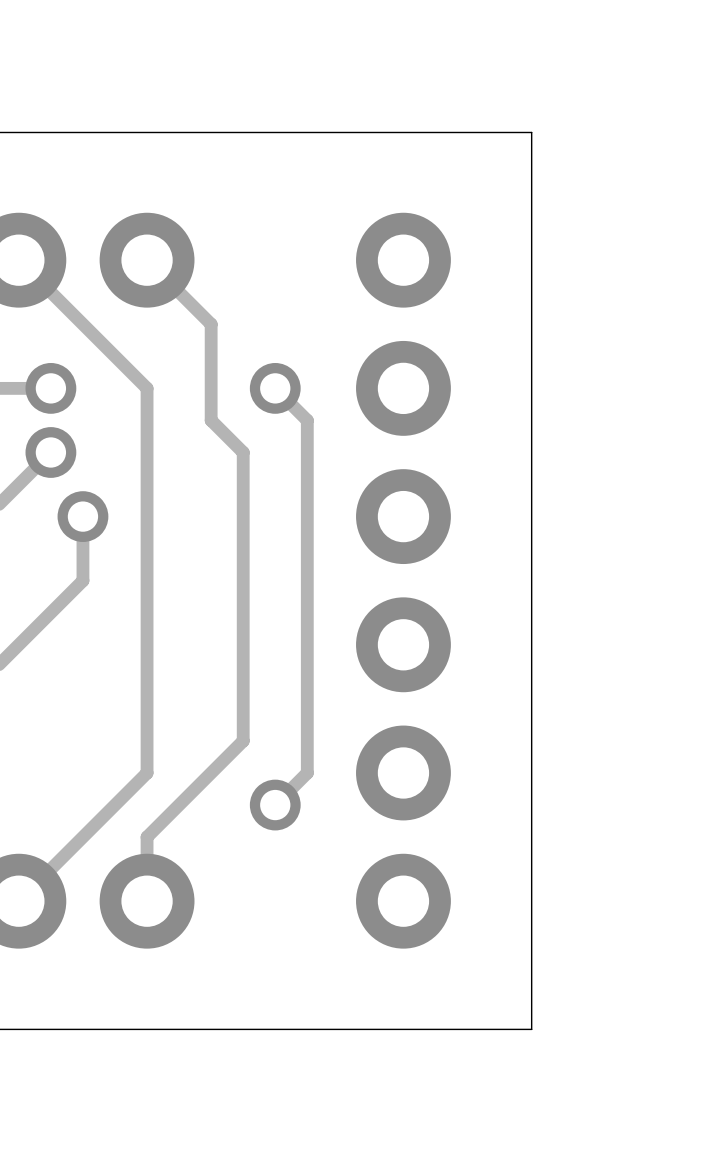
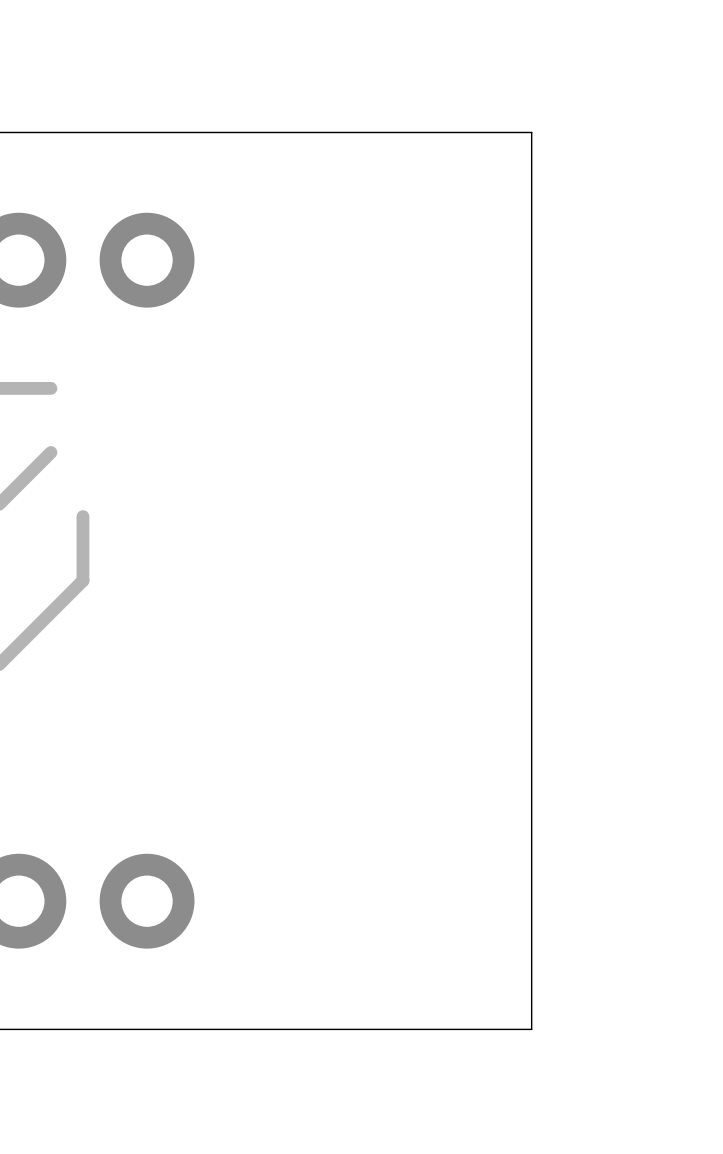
track: (18, 260) (147, 388) (147, 772) (18, 901) -> none
track: (147, 260) (211, 324) (211, 420) (243, 452) (243, 740) (147, 837) (147, 901) -> none
via: (50, 388) -> none
track: (275, 388) (307, 420) (307, 772) (275, 805) -> none
via: (275, 388) -> none
via: (50, 452) -> none
via: (82, 516) -> none
part: (403, 580) -> none
via: (275, 805) -> none

